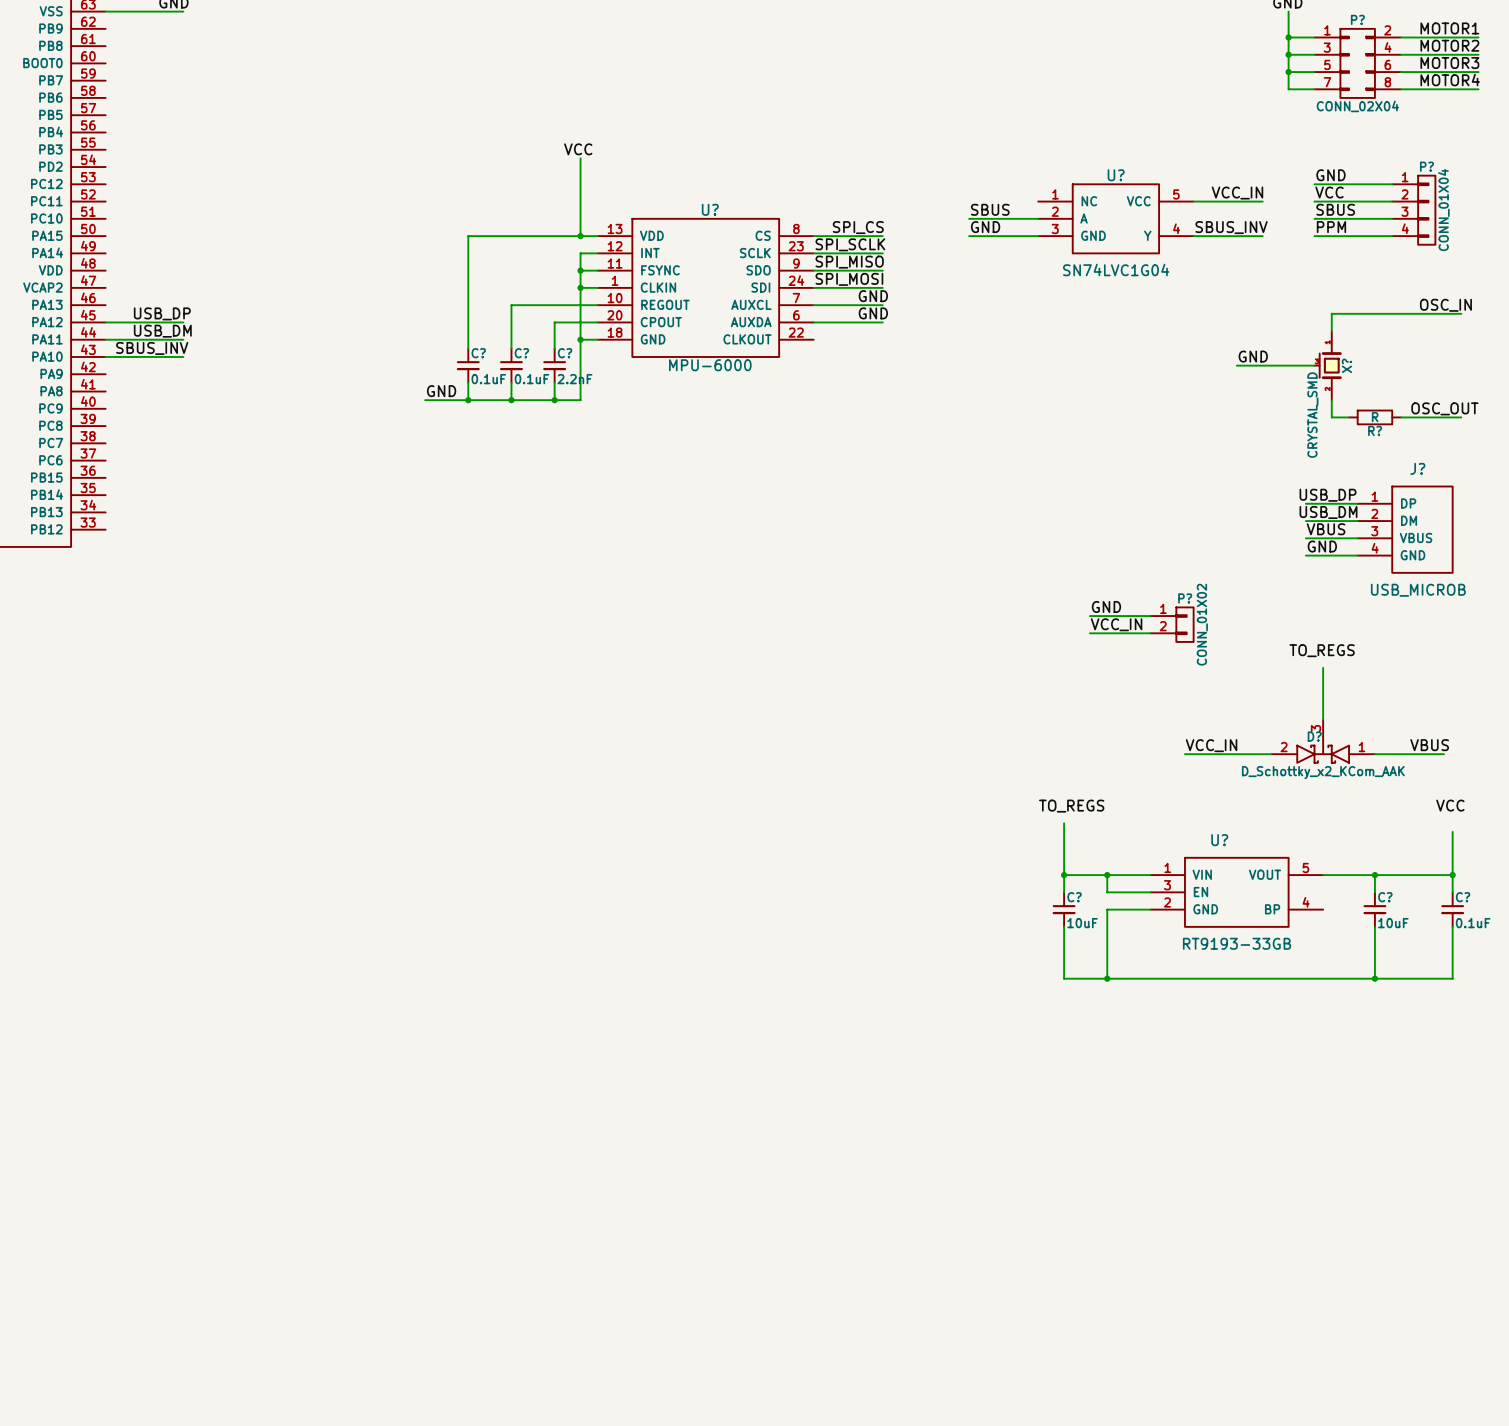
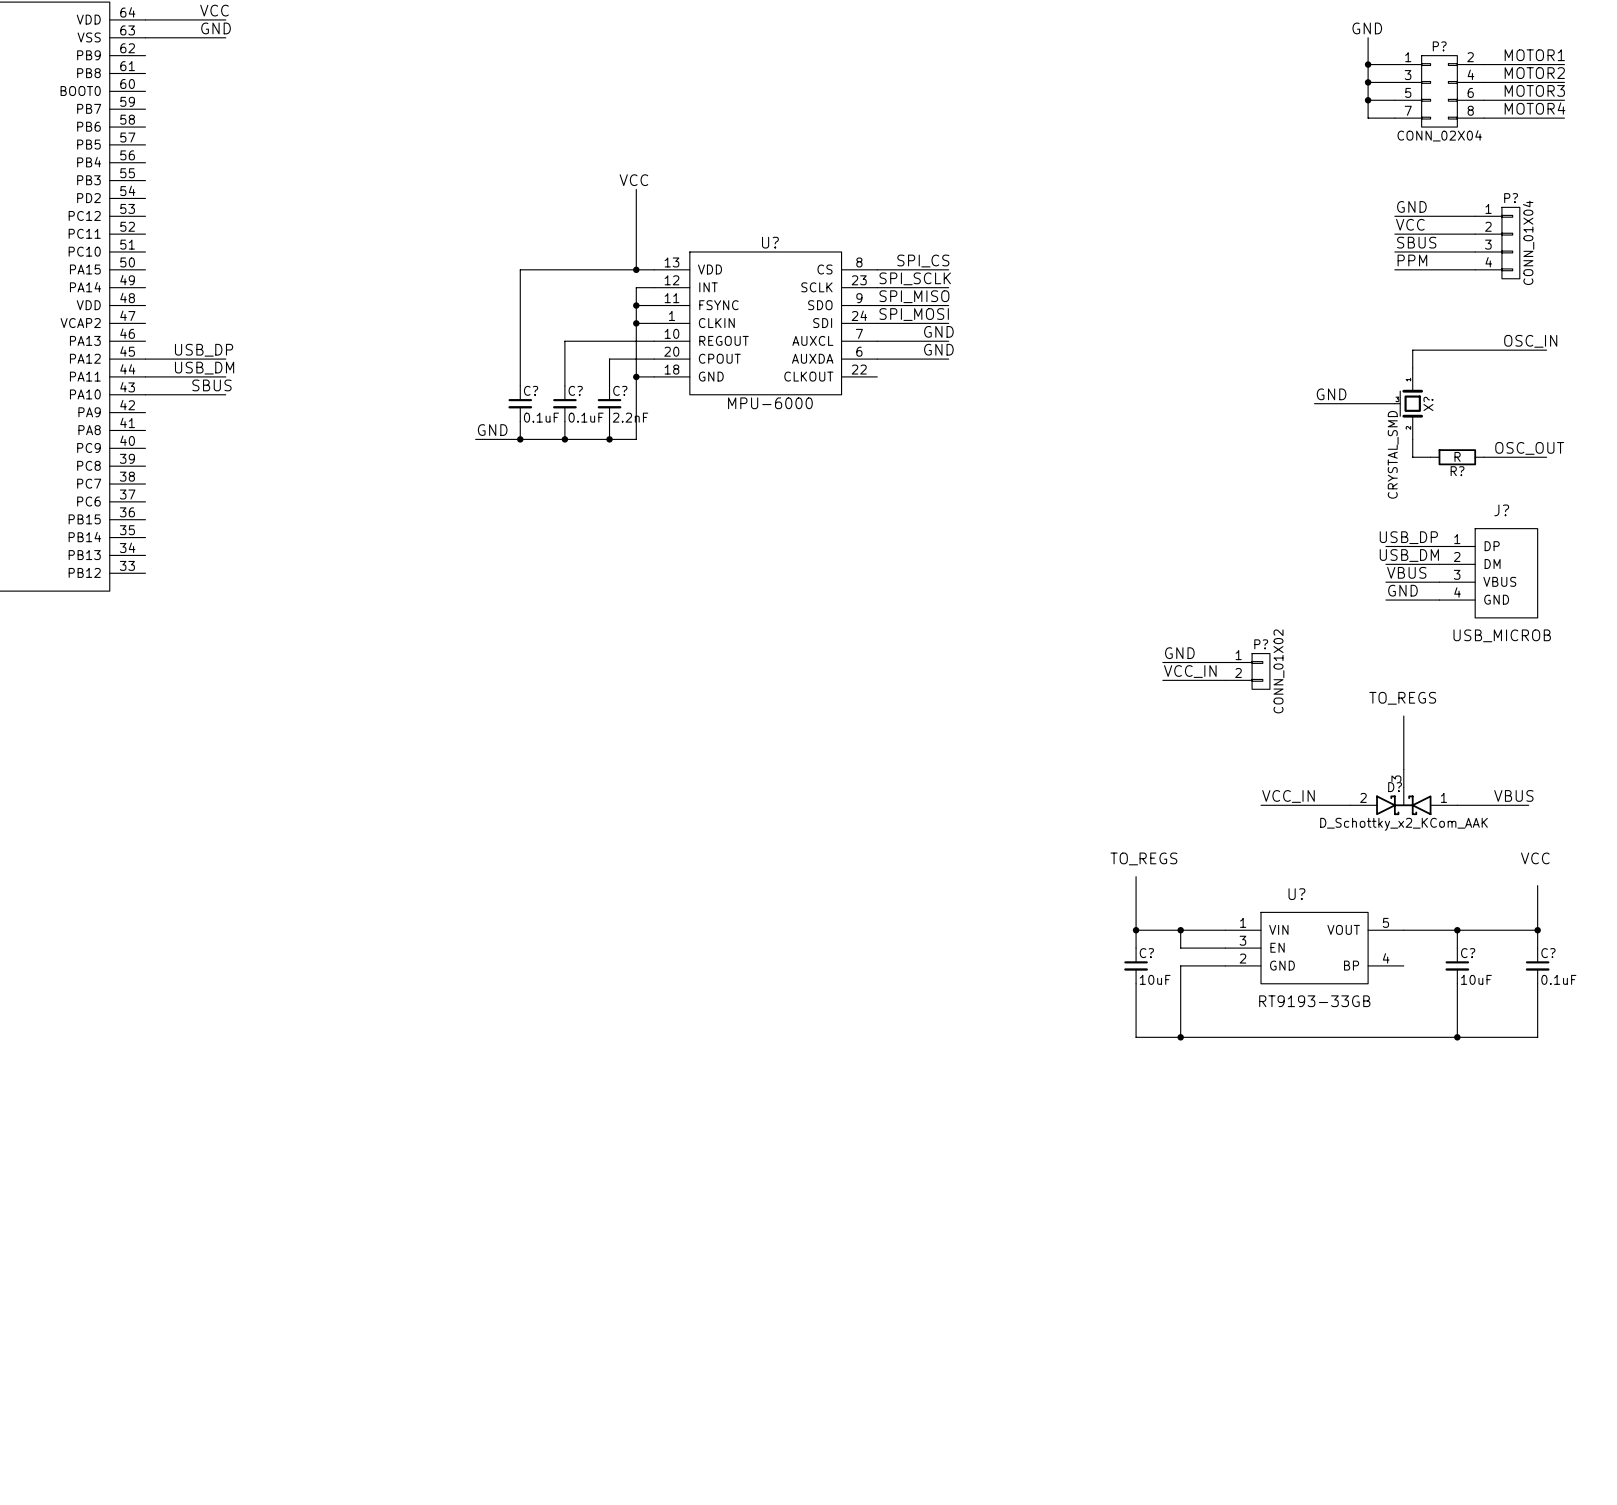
label: VCC_IN (1237, 193) -> none
wire: (1193, 201) (1262, 201) -> none
label: SBUS (990, 209) -> none
wire: (969, 218) (1038, 218) -> none
U?: SN74LVC1G04 (1115, 218) -> none
label: GND (985, 227) -> none
label: SBUS_INV (1231, 227) -> none
wire: (969, 236) (1038, 236) -> none
wire: (1193, 236) (1262, 236) -> none
label: SBUS_INV (152, 348) -> SBUS (211, 385)

